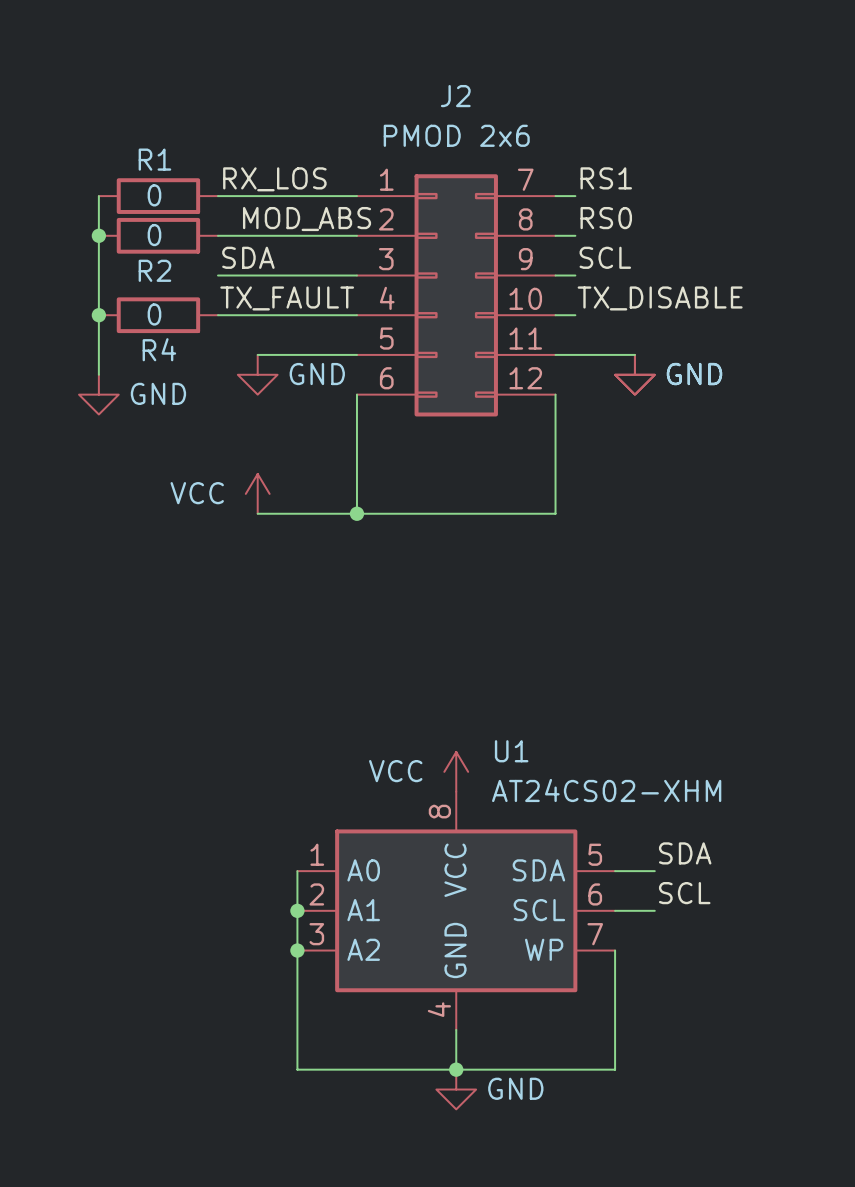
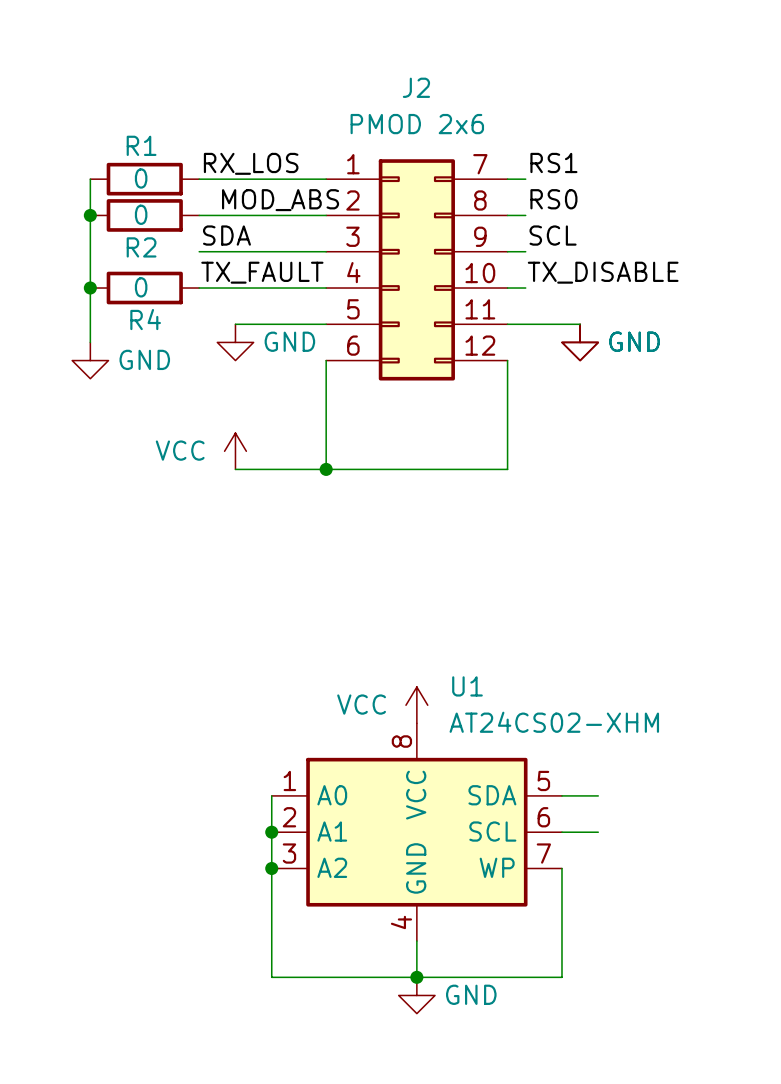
label: SDA (685, 853) -> none
label: SCL (684, 893) -> none

